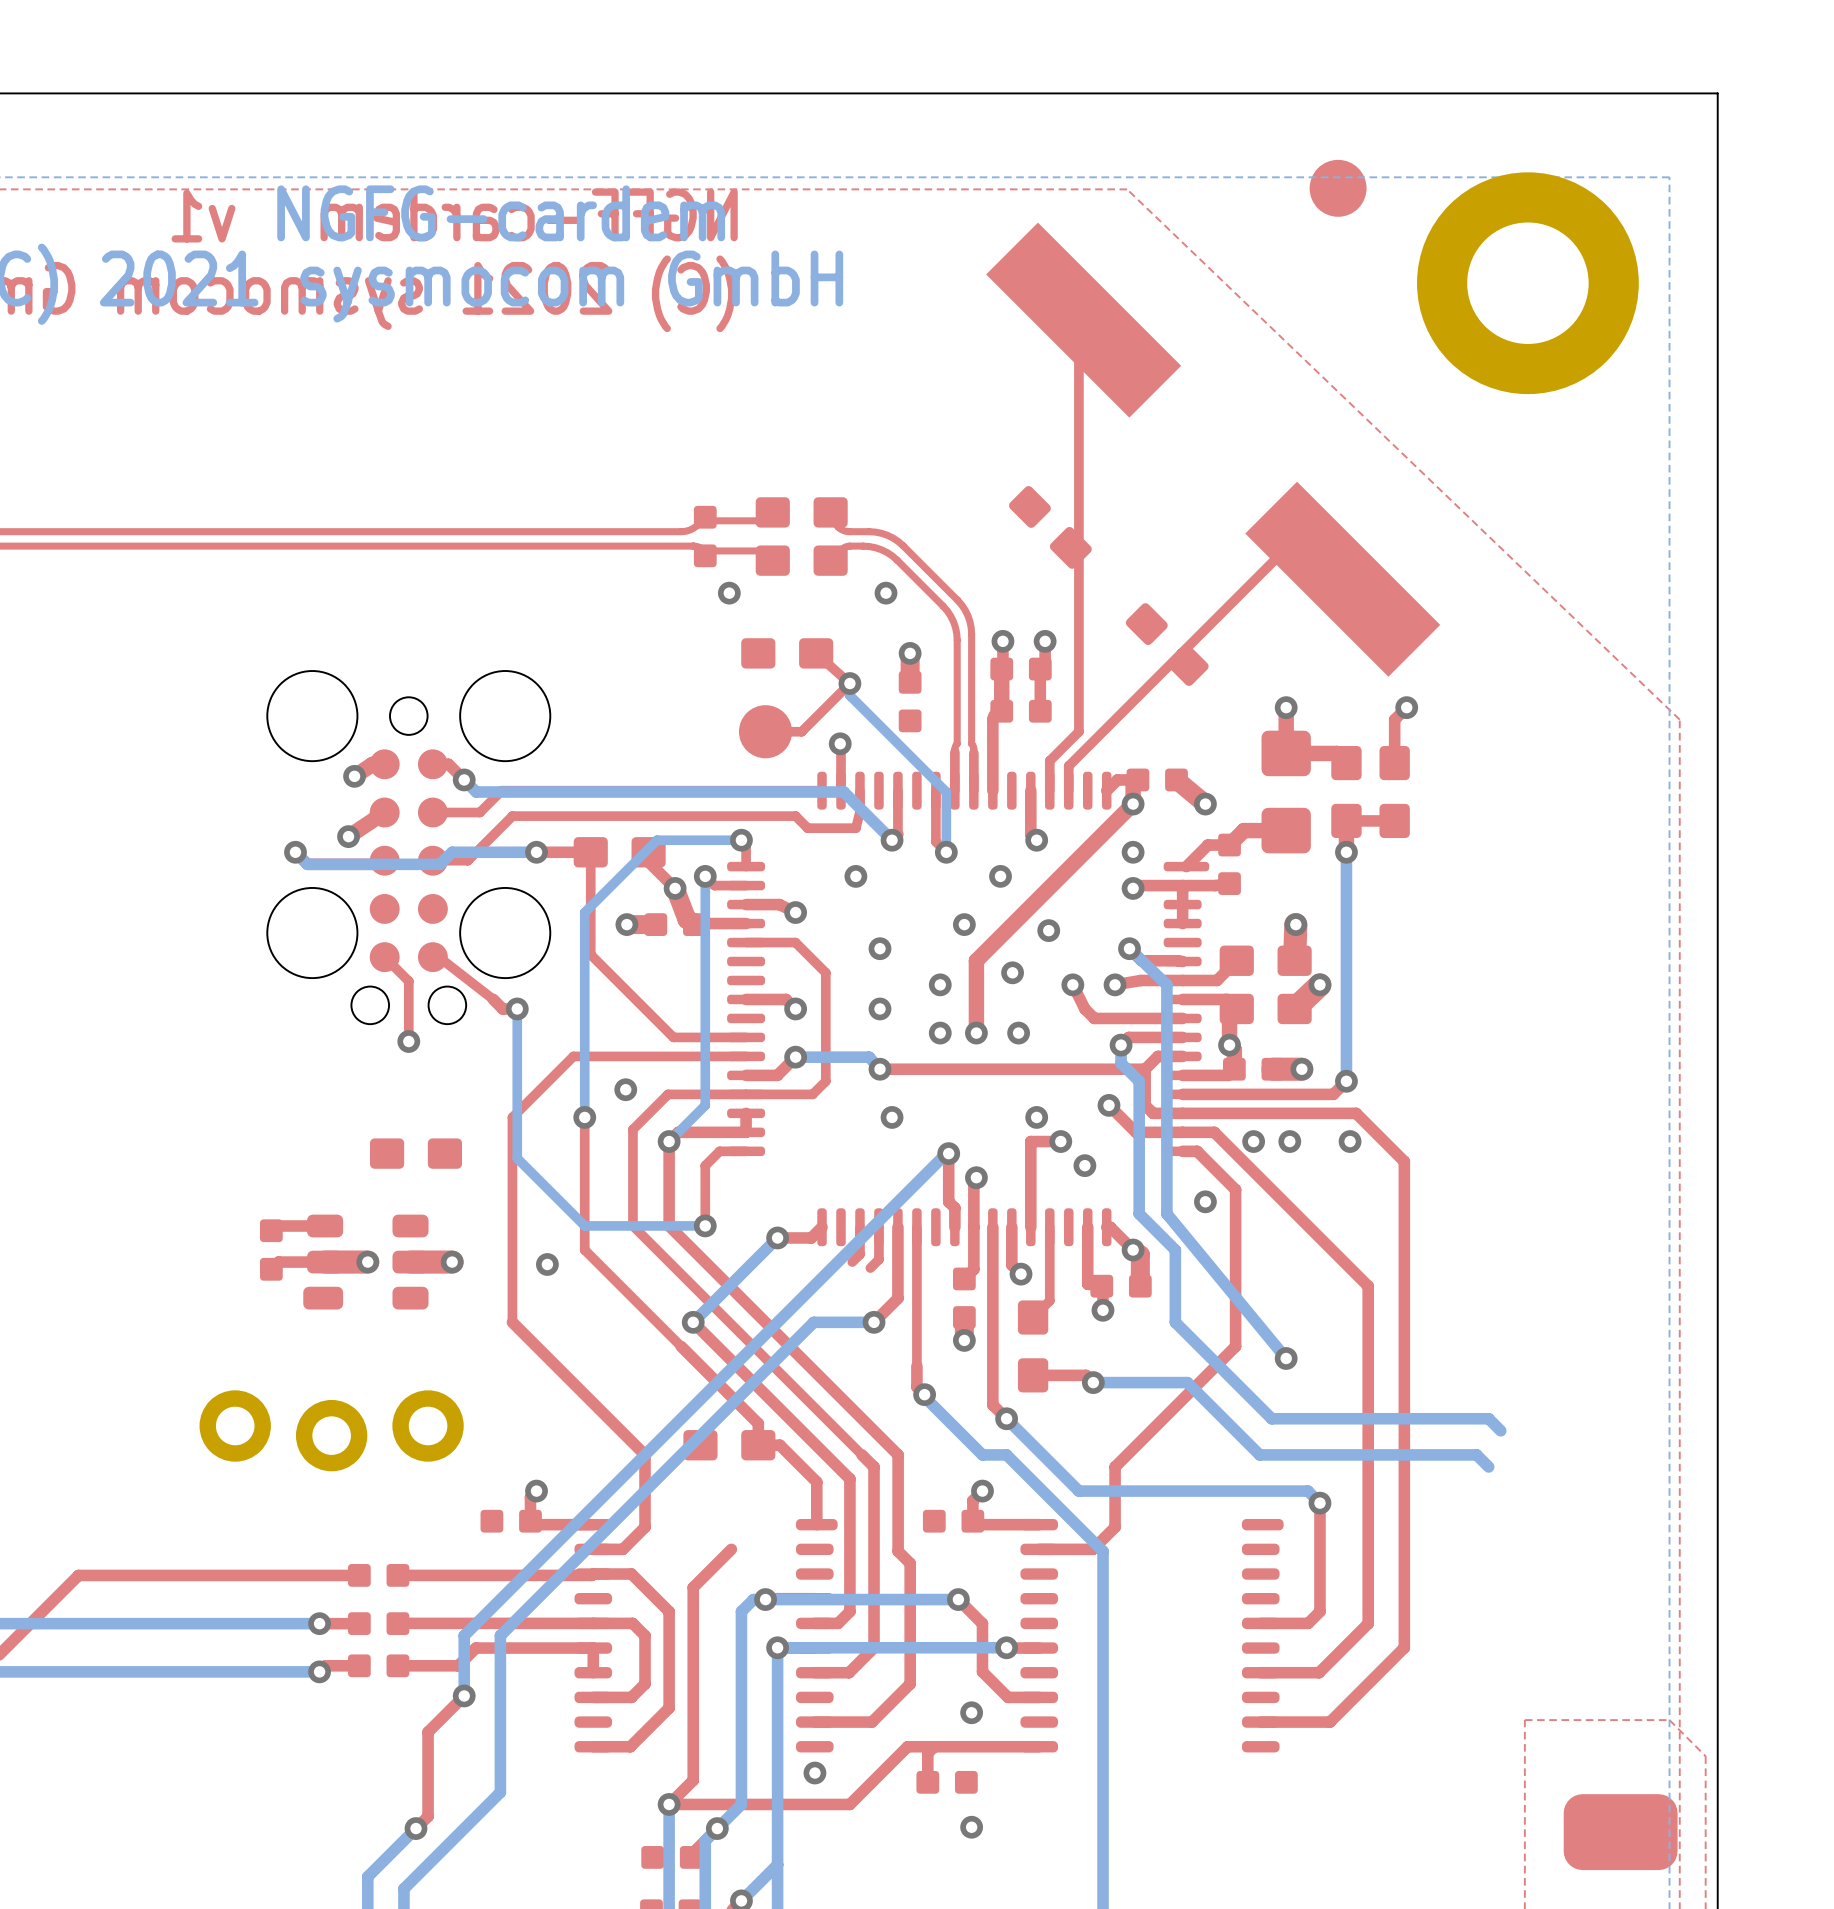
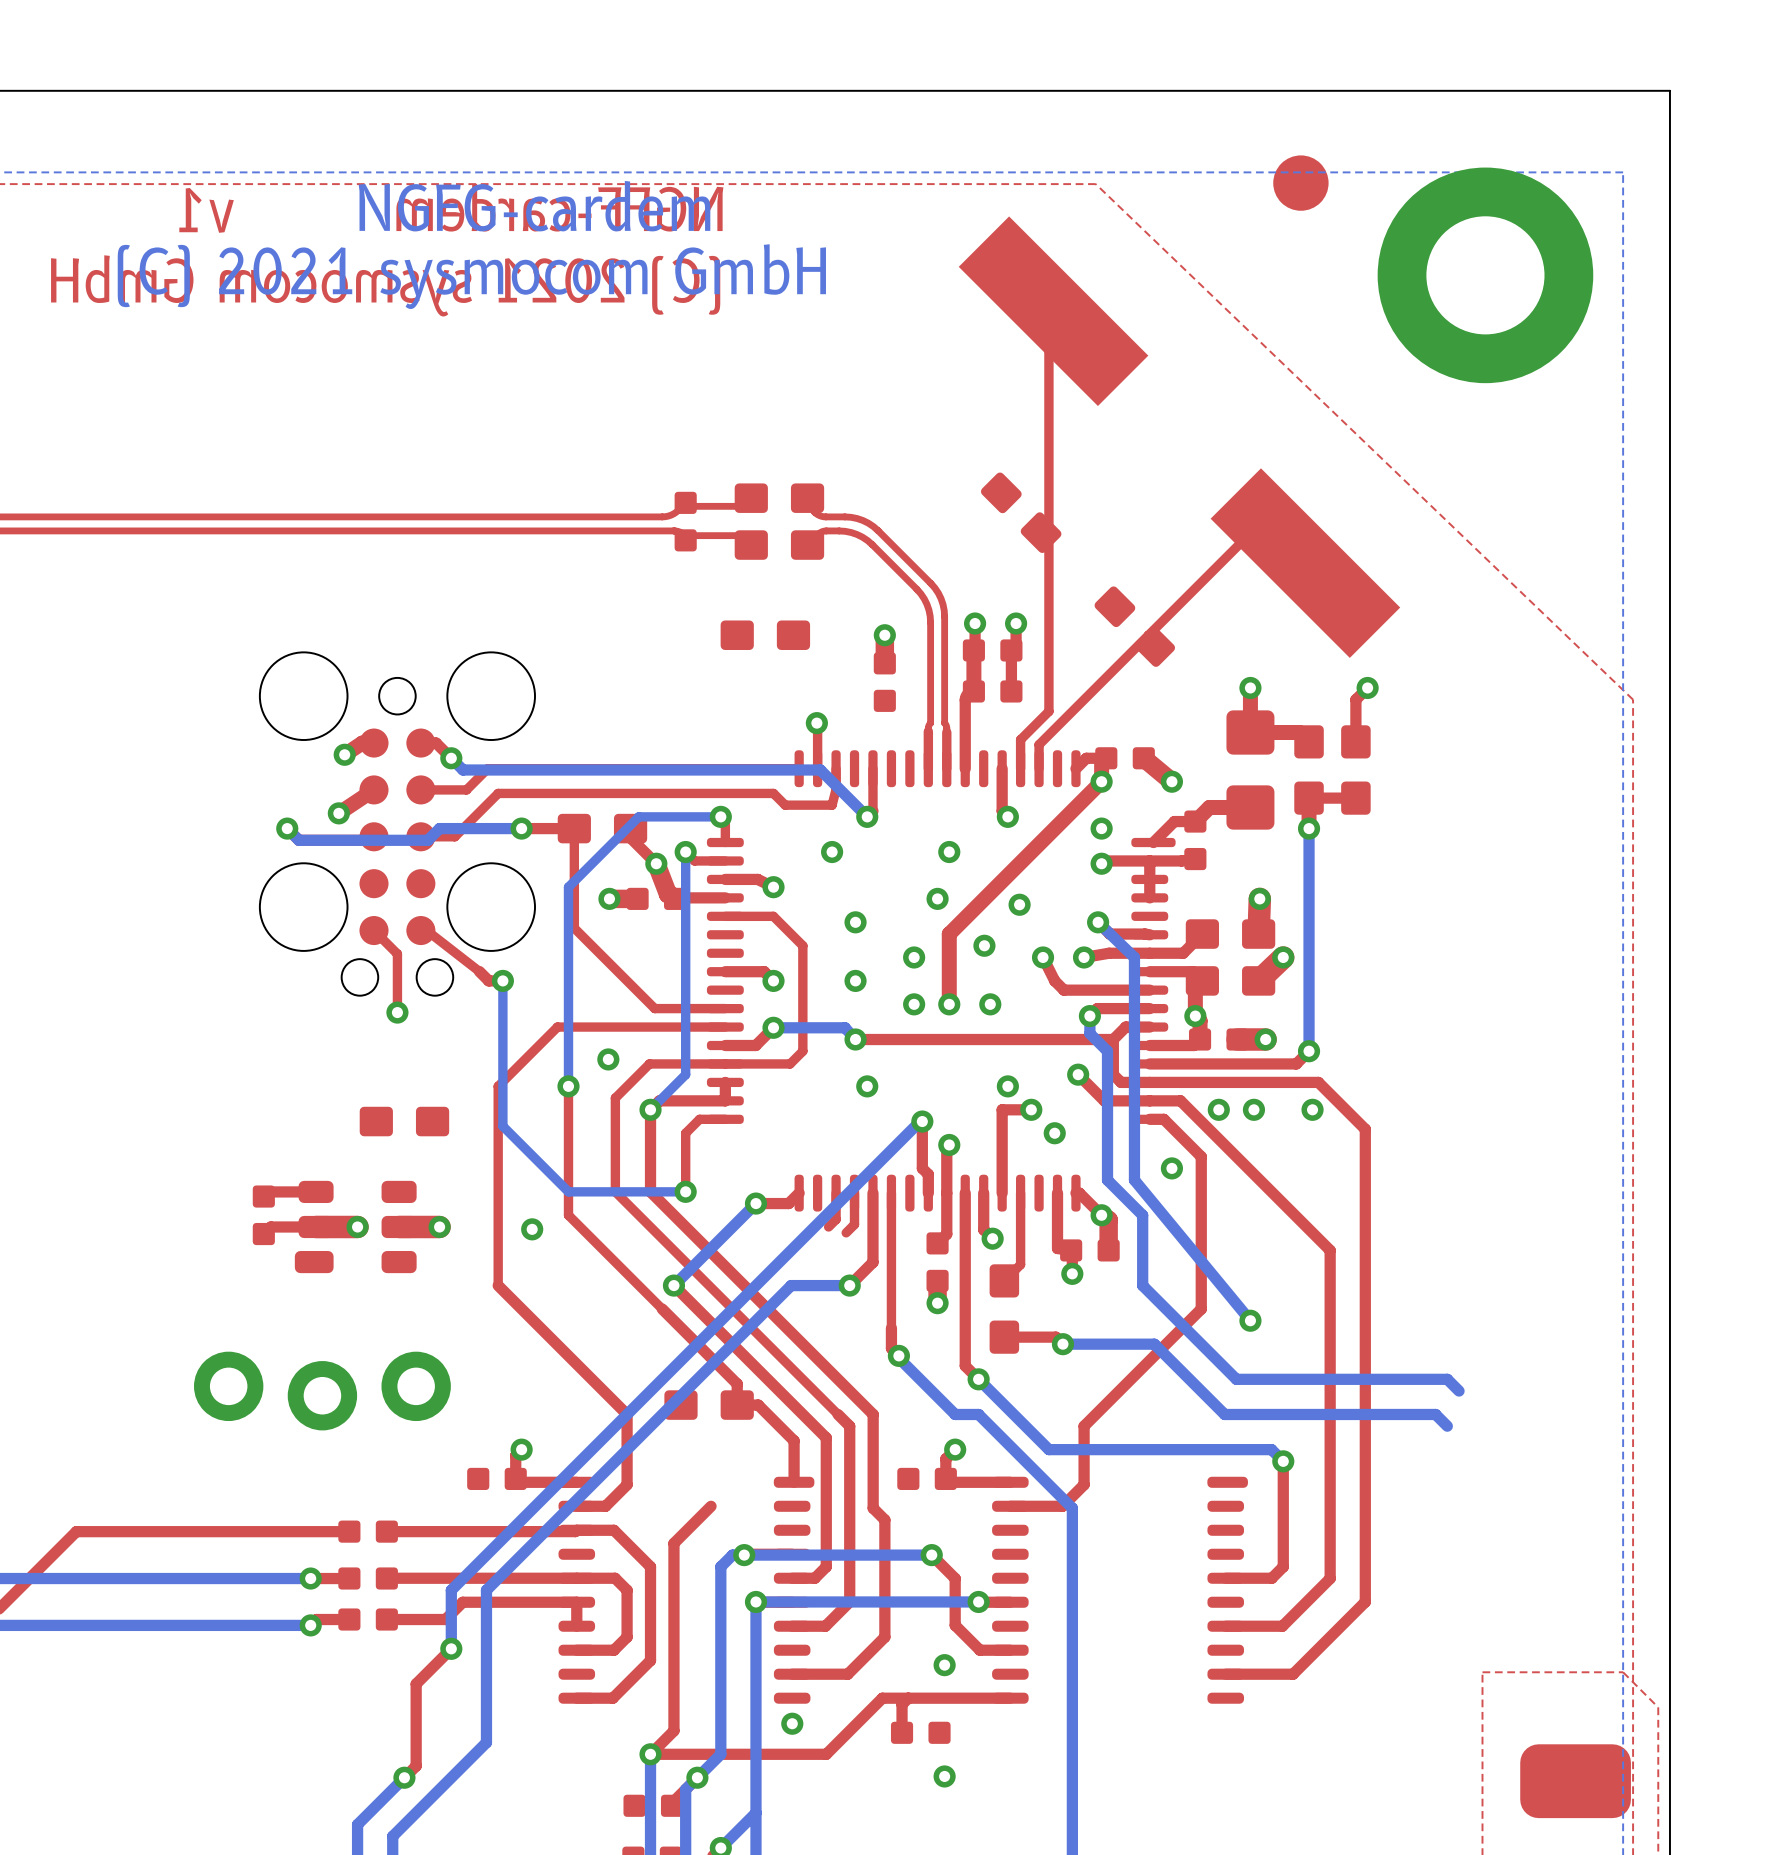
via: (729, 593) -> none
via: (886, 593) -> none
top track: (816, 653) (849, 683) (801, 731) (765, 731) -> none
bottom track: (849, 683) (849, 695) (946, 792) (946, 852) -> none
via: (849, 683) -> none
part: (765, 731) -> none
top track: (935, 790) (935, 841) (946, 852) -> none
via: (946, 852) -> none
via: none -> (949, 852)
via: (1000, 876) -> none

